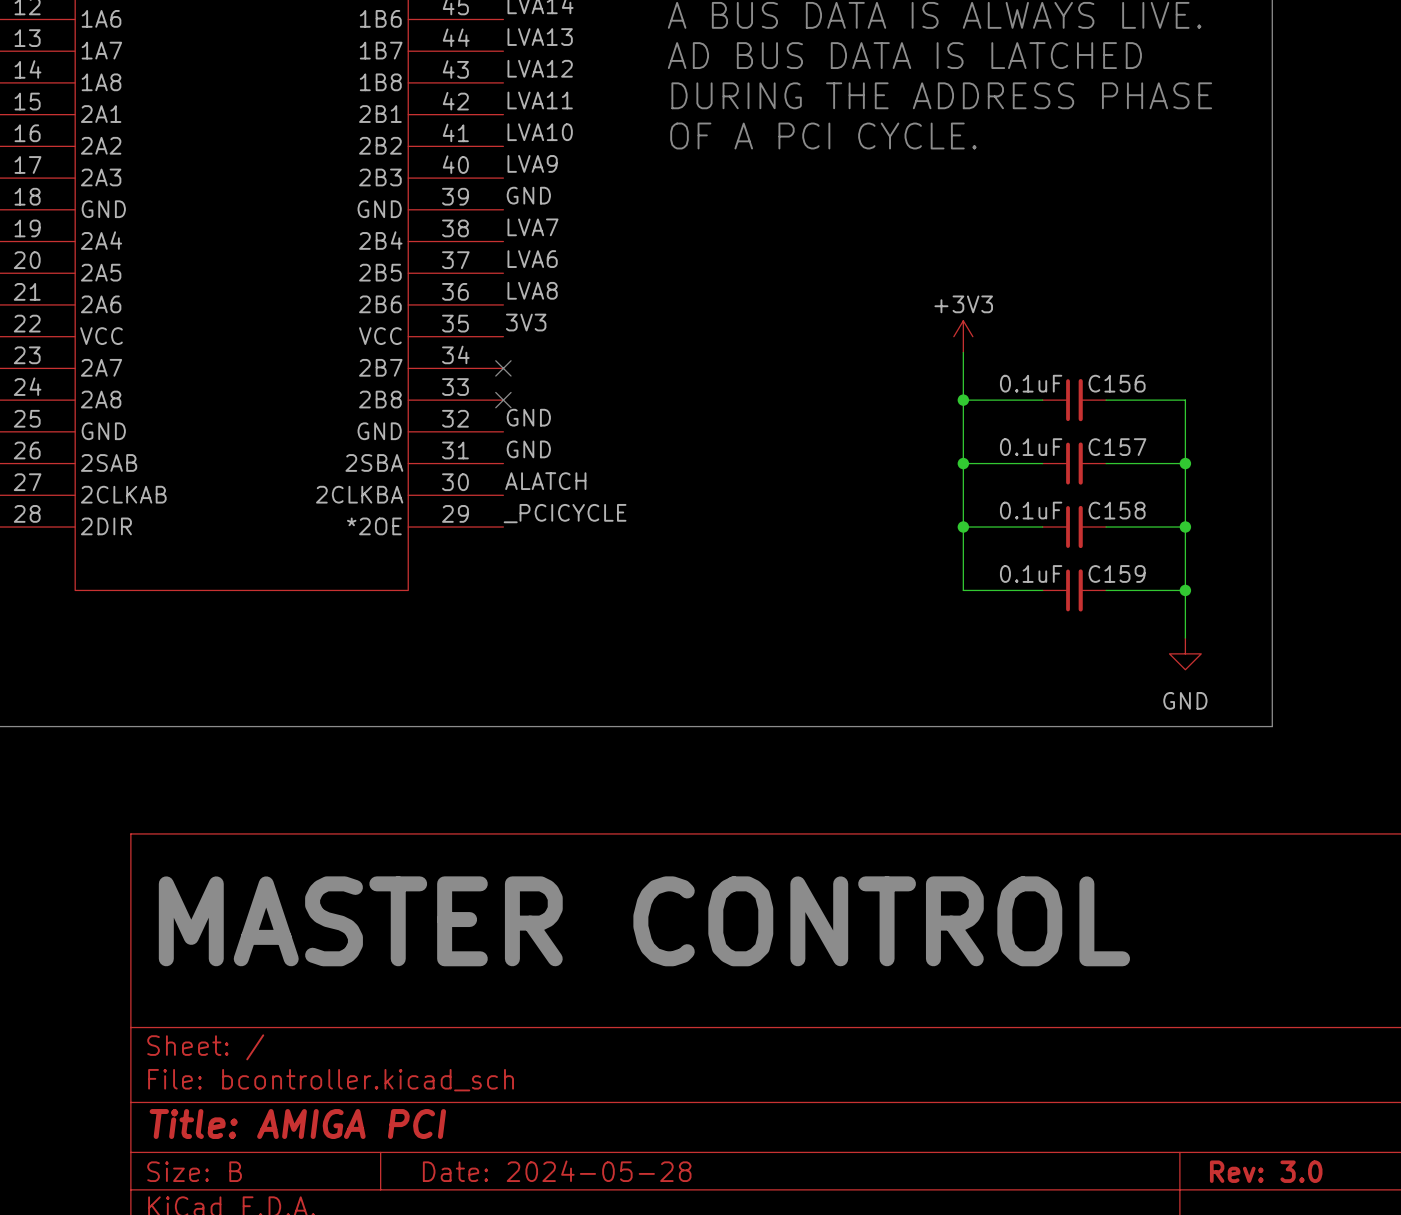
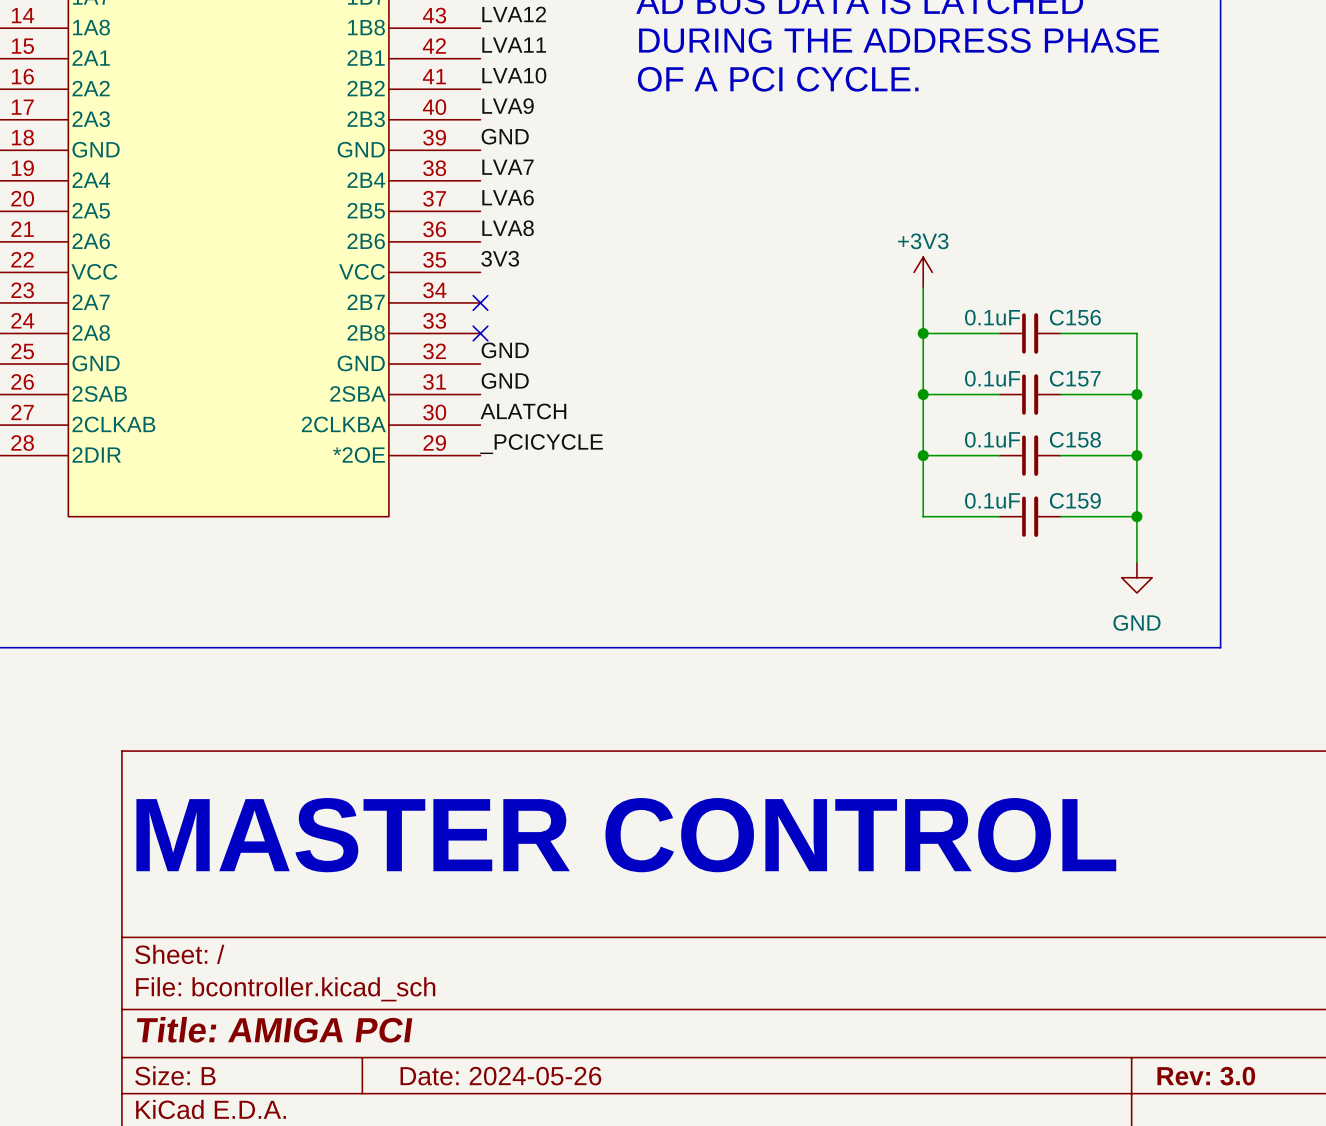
title block: Date: 2024-05-28 (557, 1171) -> Date: 2024-05-26 (500, 1076)

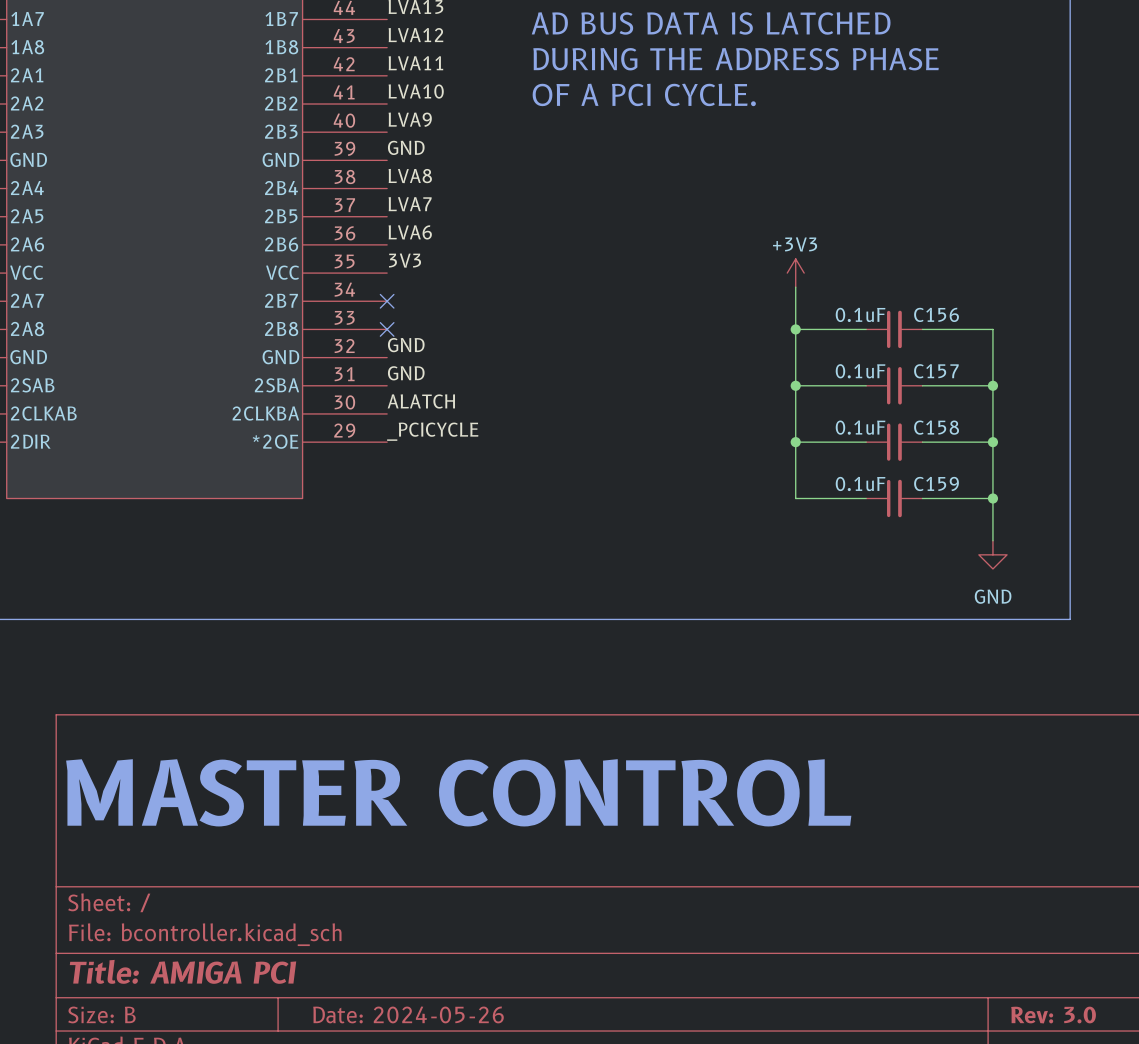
label: LVA7 (508, 167) -> LVA8 (410, 176)
label: LVA6 (508, 197) -> LVA7 (410, 204)
label: LVA8 (508, 228) -> LVA6 (410, 232)

